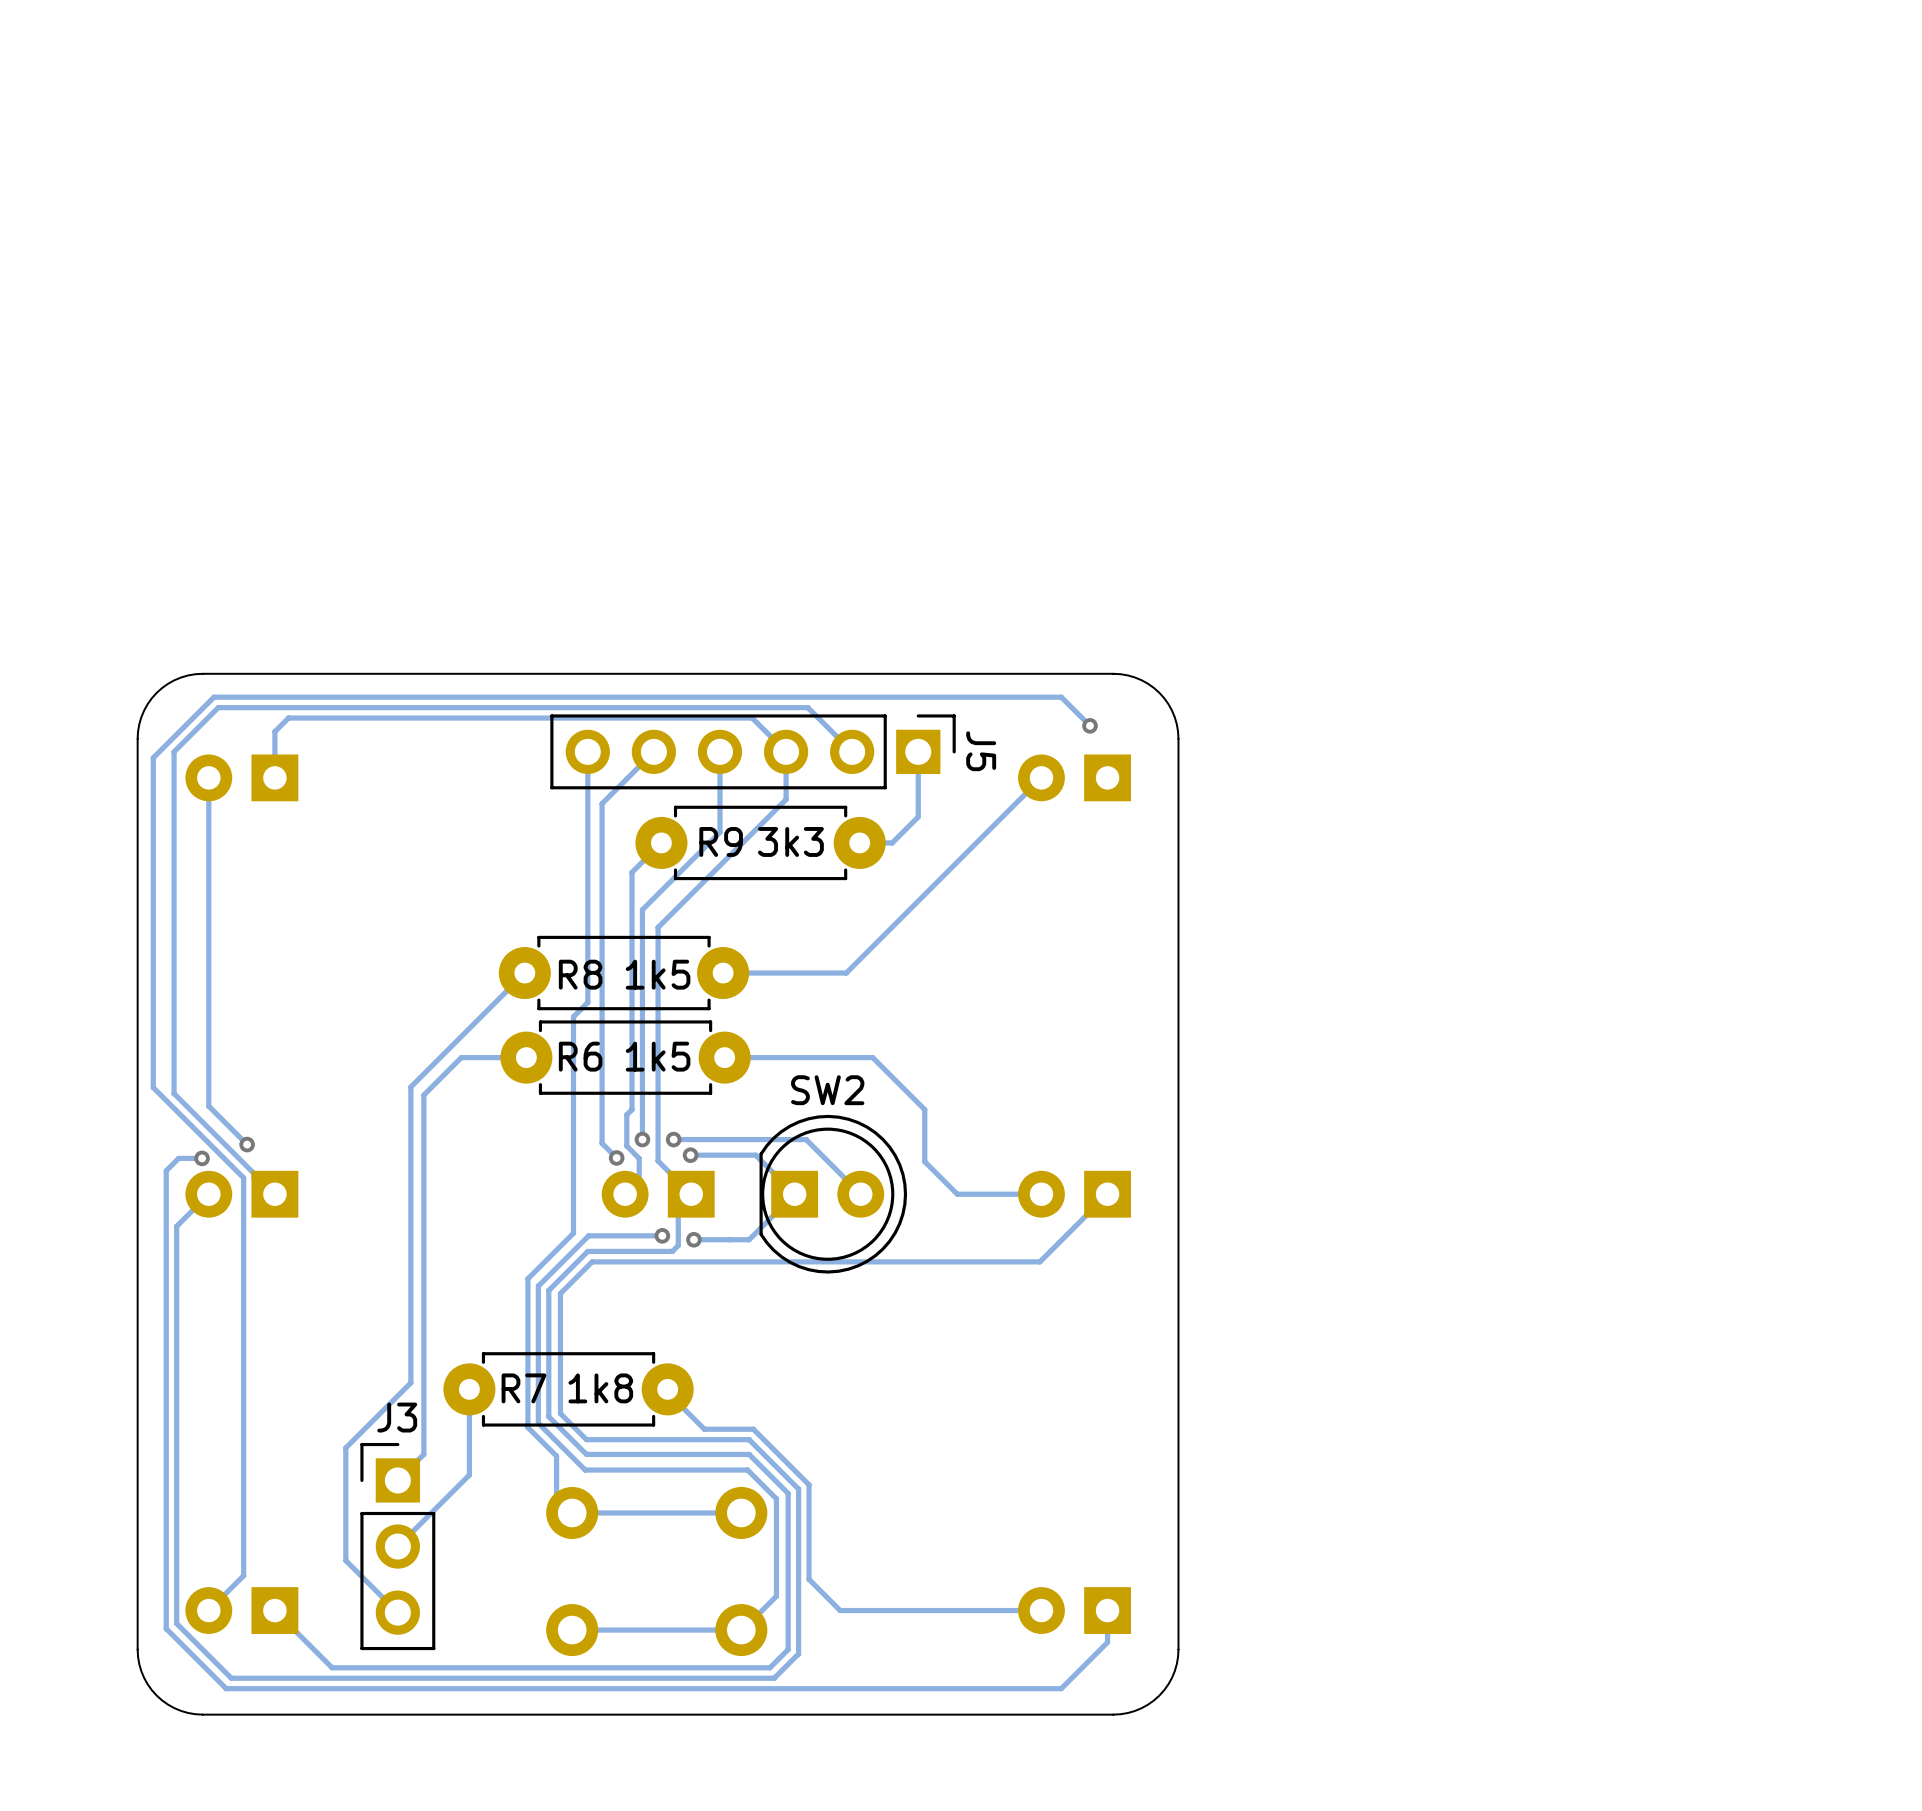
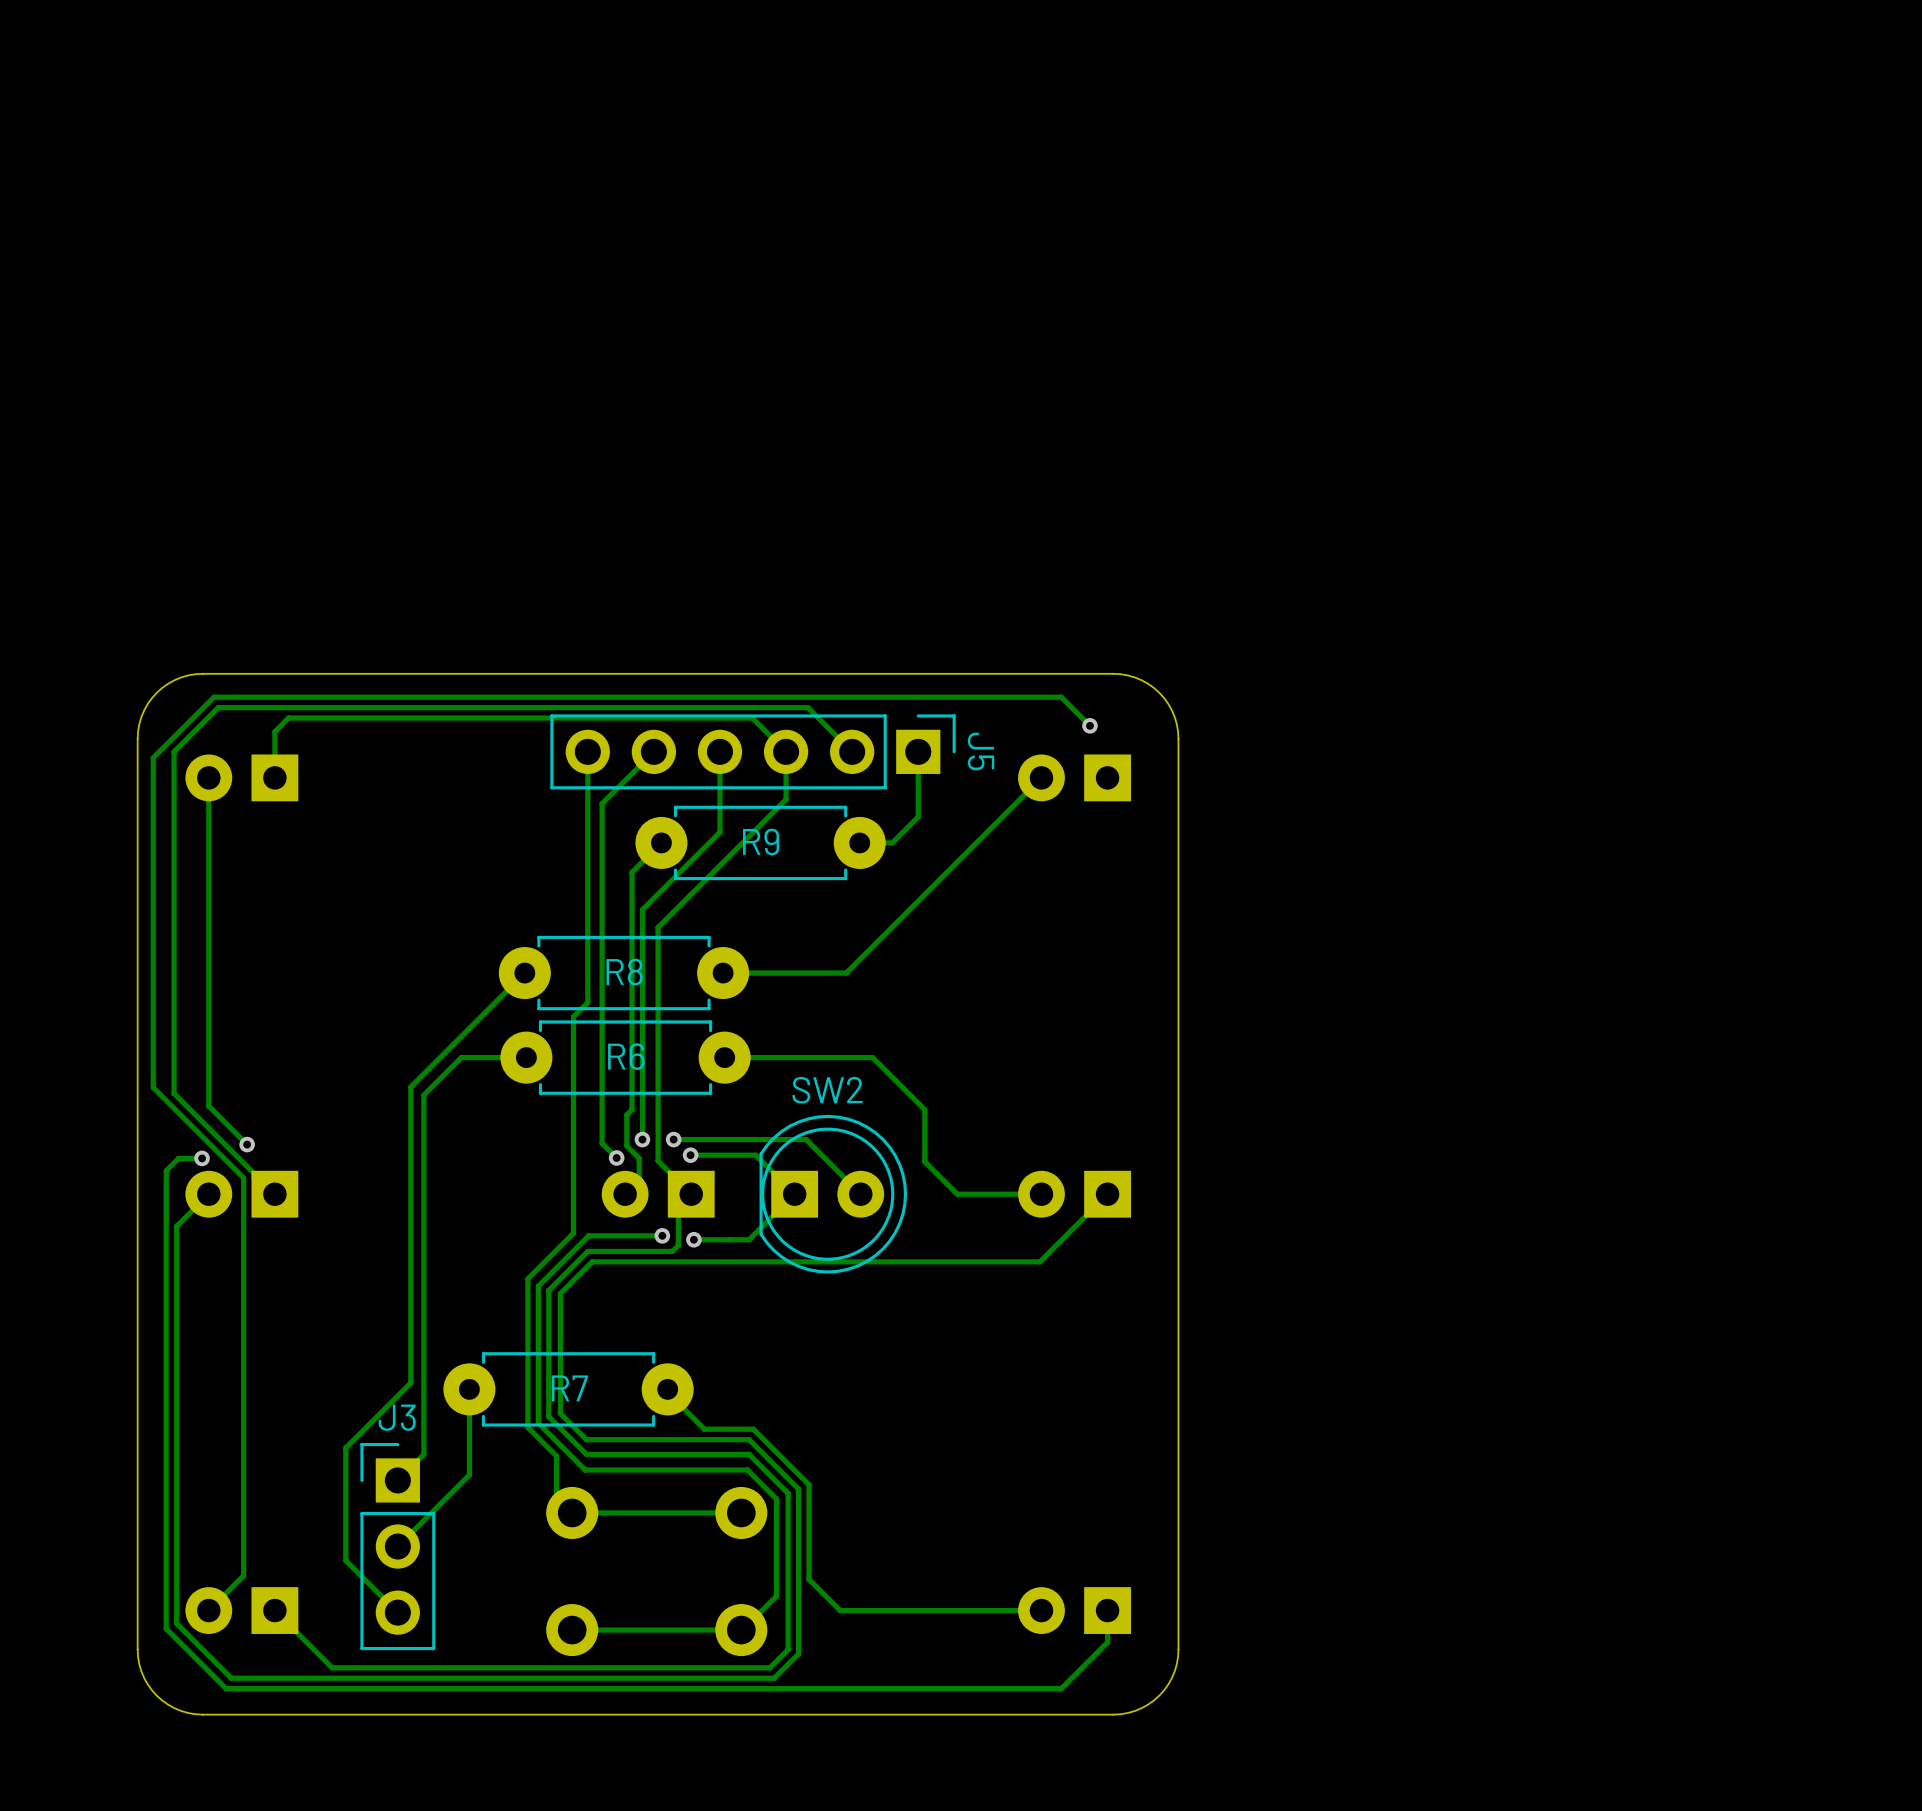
R9 name position: R9 (721, 841) -> R9 (761, 841)
R9 value: 3k3 (790, 841) -> none
R8 name position: R8 (580, 974) -> R8 (624, 972)
R8 value: 1k5 (658, 974) -> none
R6 name position: R6 (580, 1056) -> R6 (626, 1056)
R6 value: 1k5 (658, 1056) -> none
R7 name position: R7 (523, 1388) -> R7 (569, 1388)
R7 value: 1k8 (600, 1388) -> none

